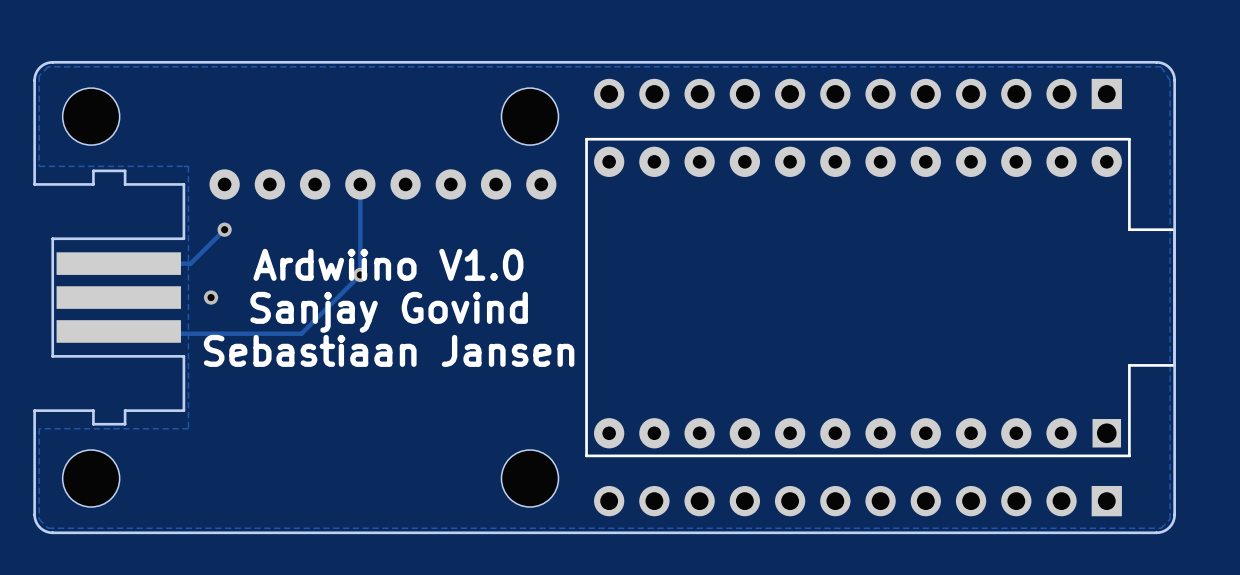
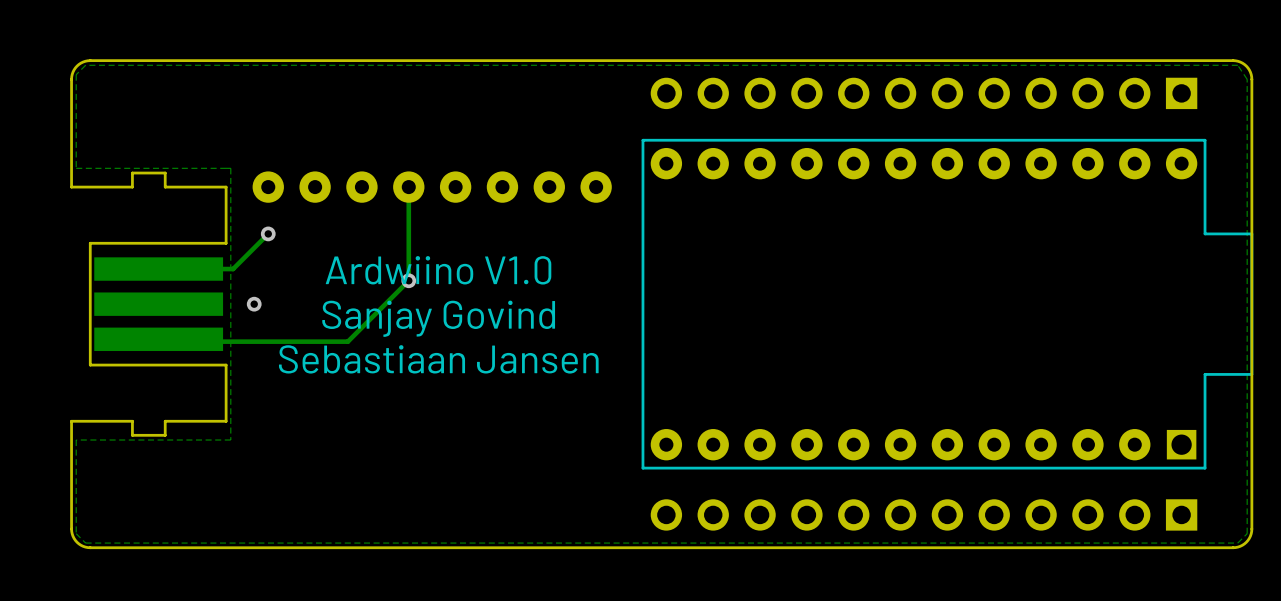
part: (91, 116) -> none
part: (529, 116) -> none
part: (91, 478) -> none
part: (529, 478) -> none

